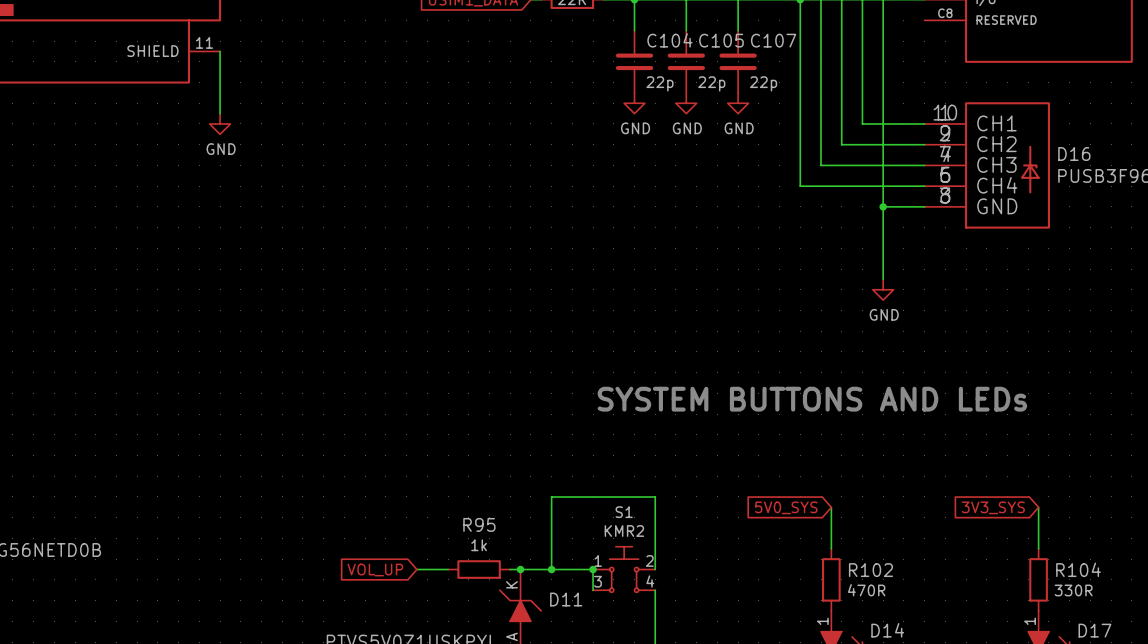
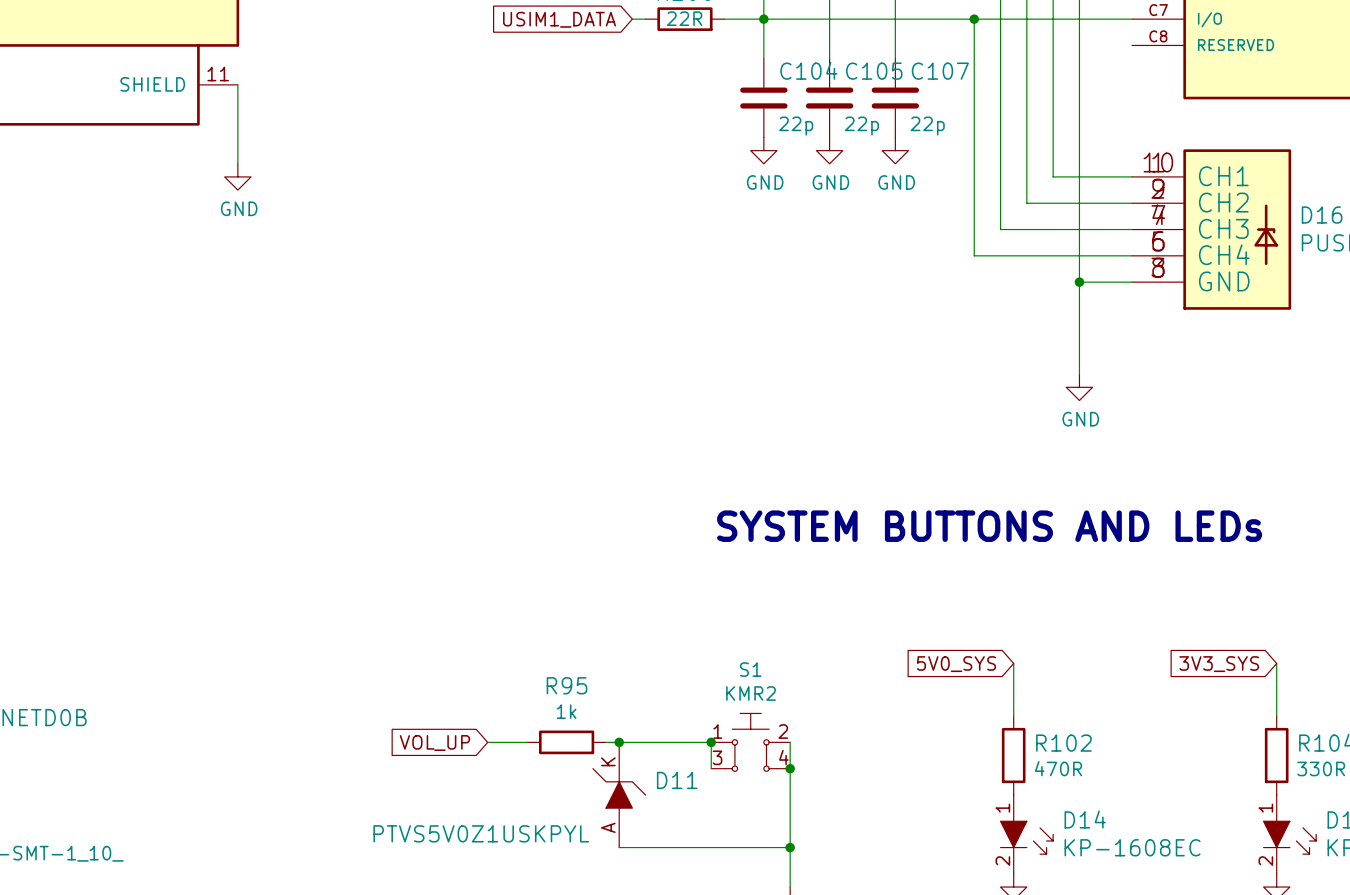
wire: (551, 569) (551, 496) (655, 496) (655, 569) -> (790, 768) (790, 742)
junction: (551, 569) -> none
junction: none -> (790, 768)

